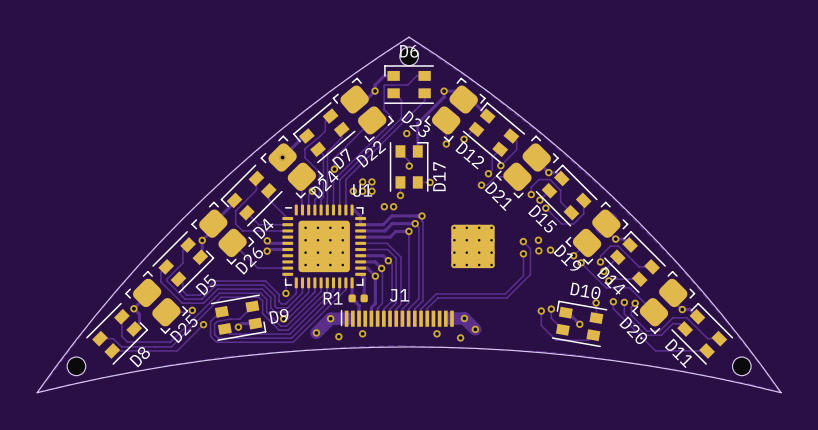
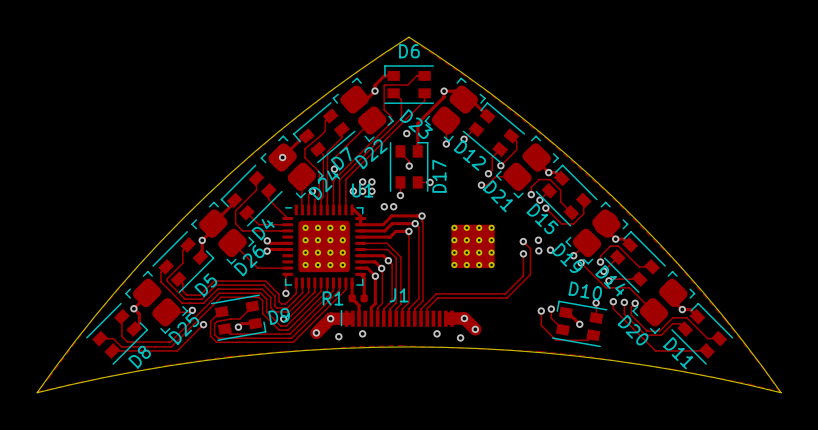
part: (409, 56) -> none
part: (76, 366) -> none
part: (741, 366) -> none

